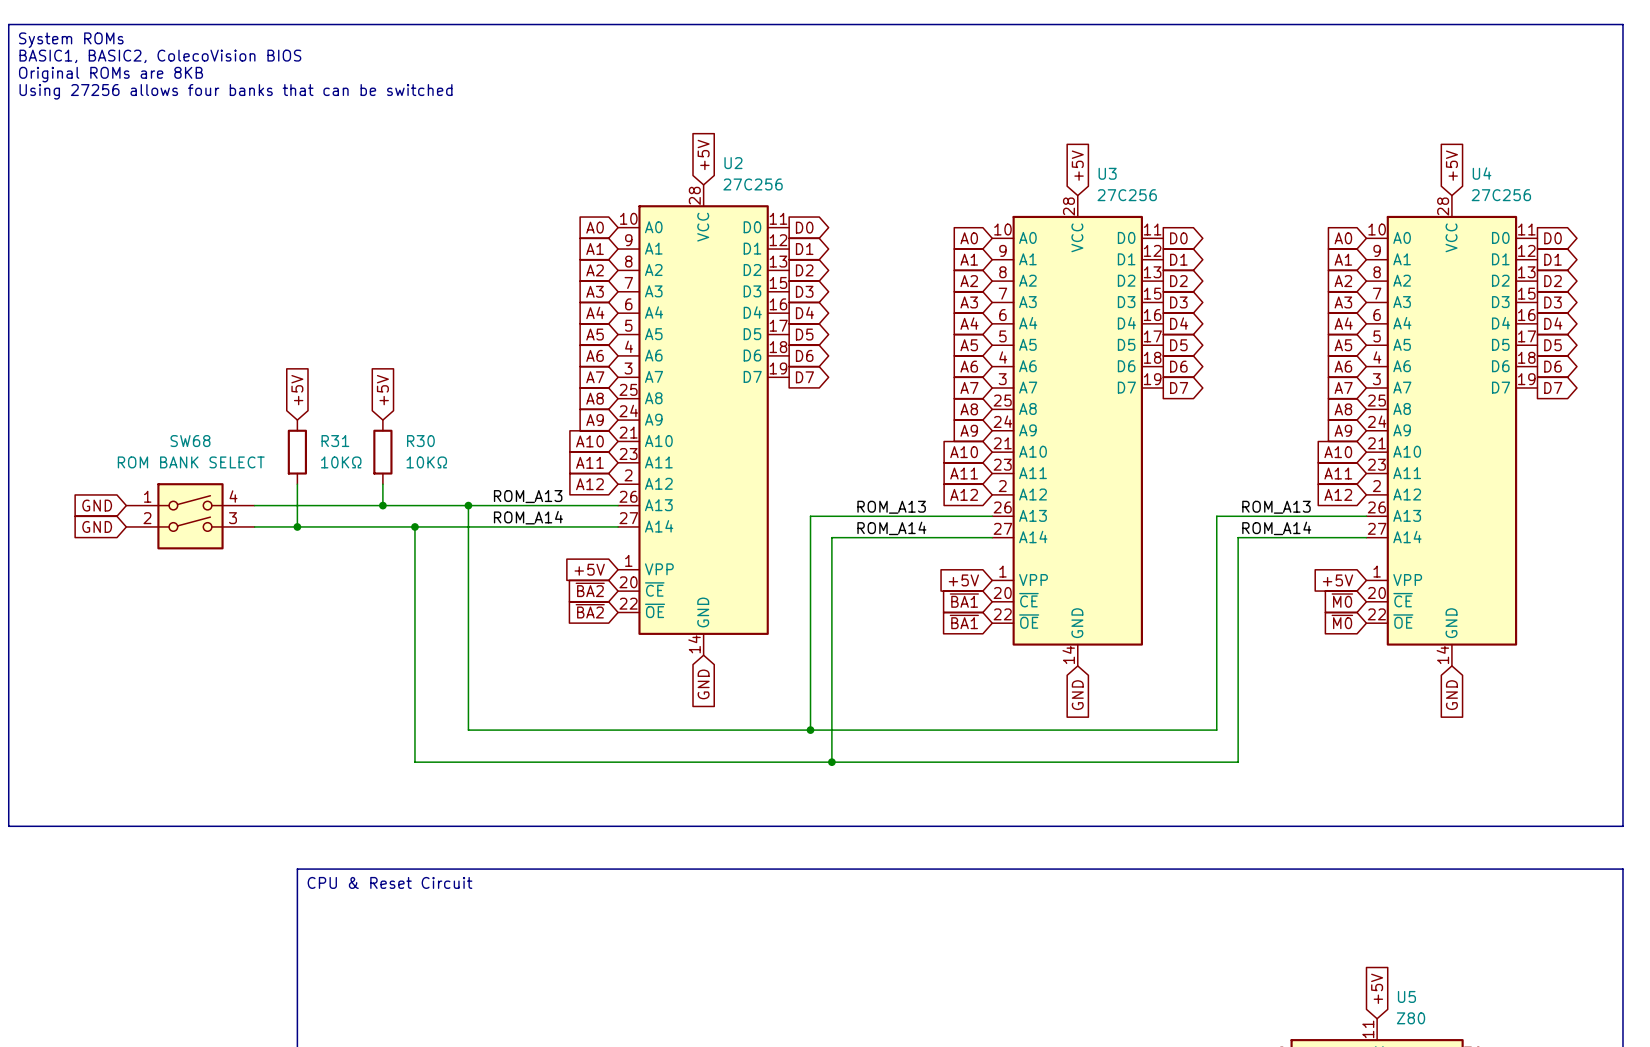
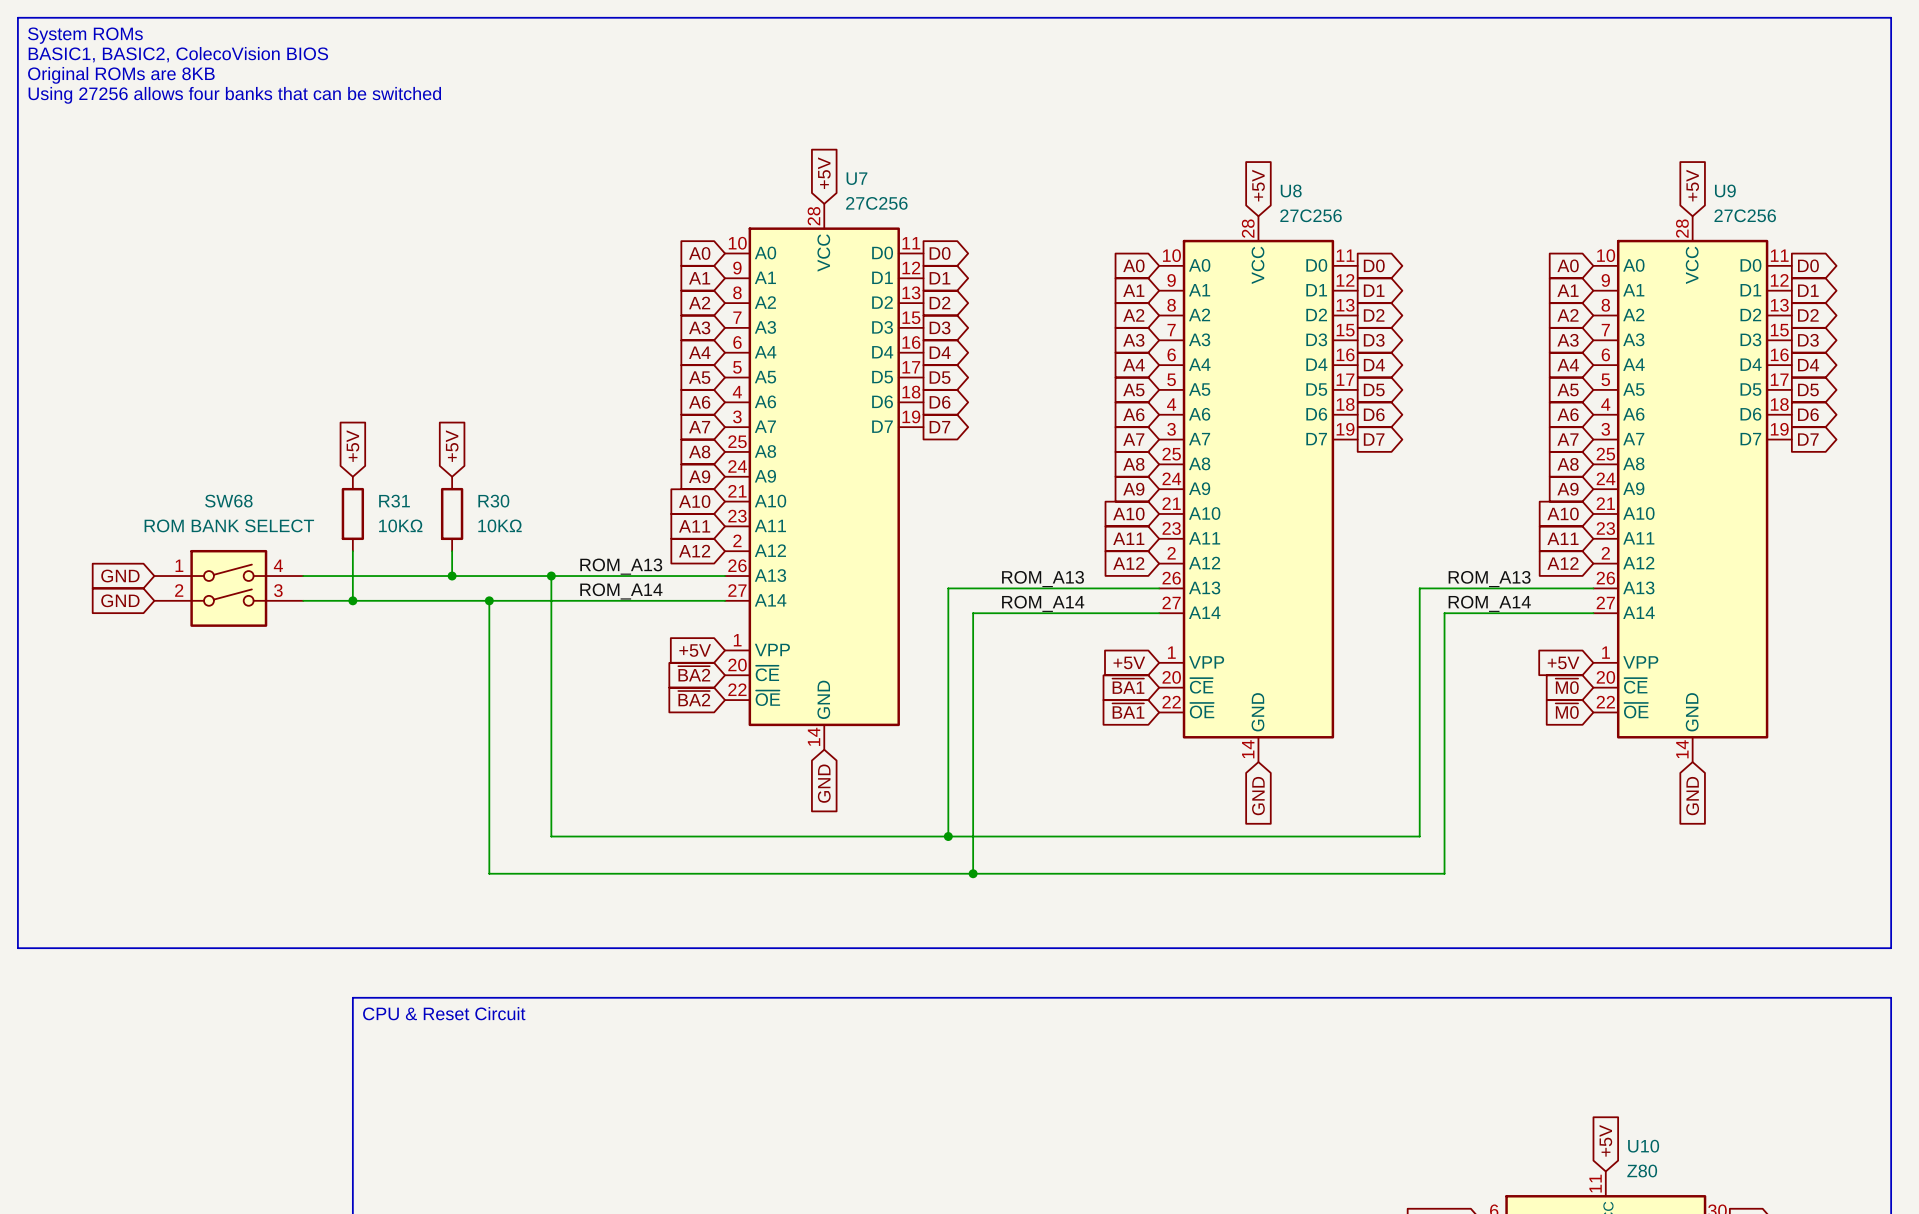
U2 name: U2 (733, 163) -> U7 (856, 178)
U3 name: U3 (1107, 173) -> U8 (1291, 190)
U4 name: U4 (1482, 173) -> U9 (1725, 190)
U5 name: U5 (1406, 996) -> U10 (1643, 1146)

